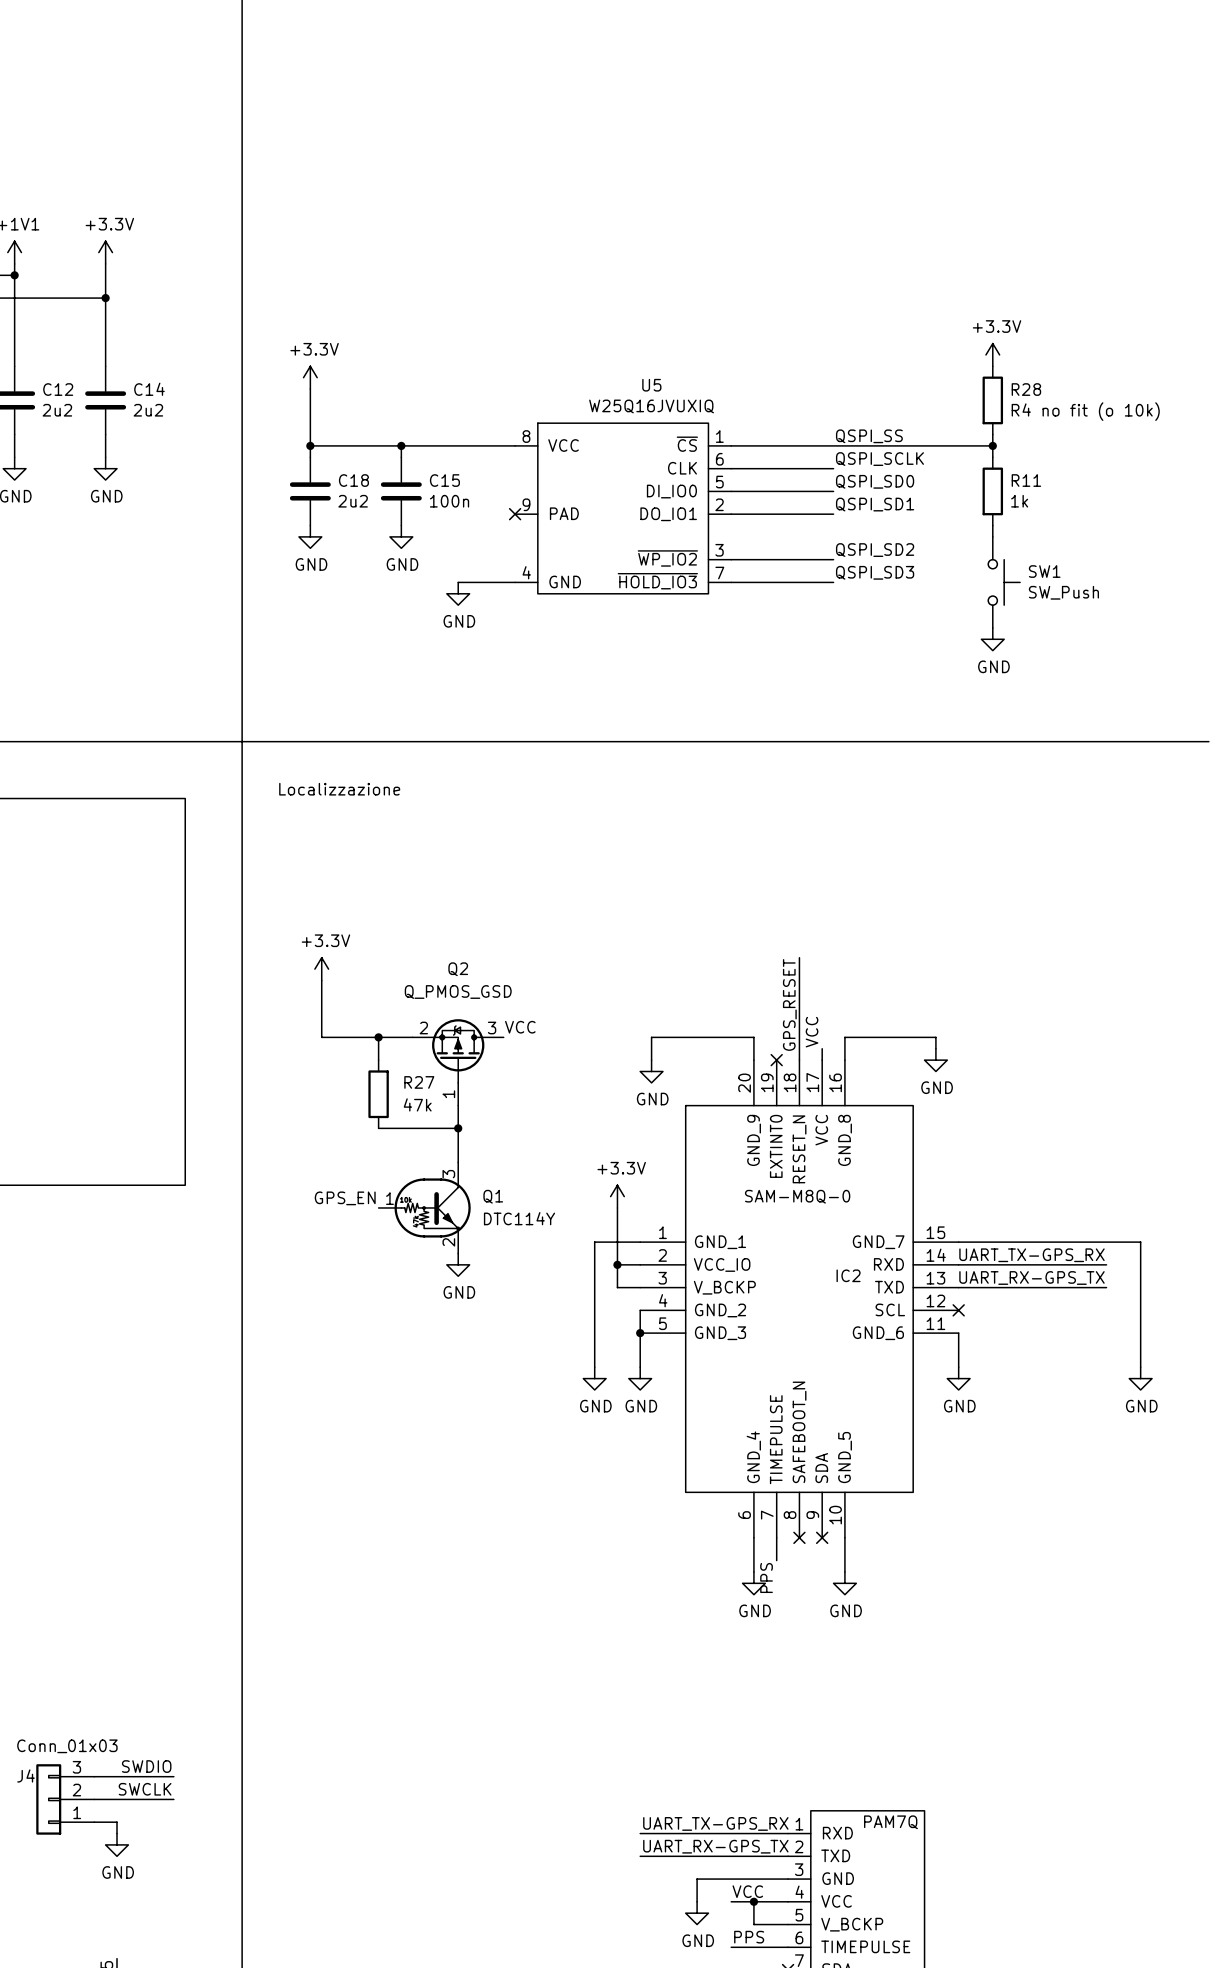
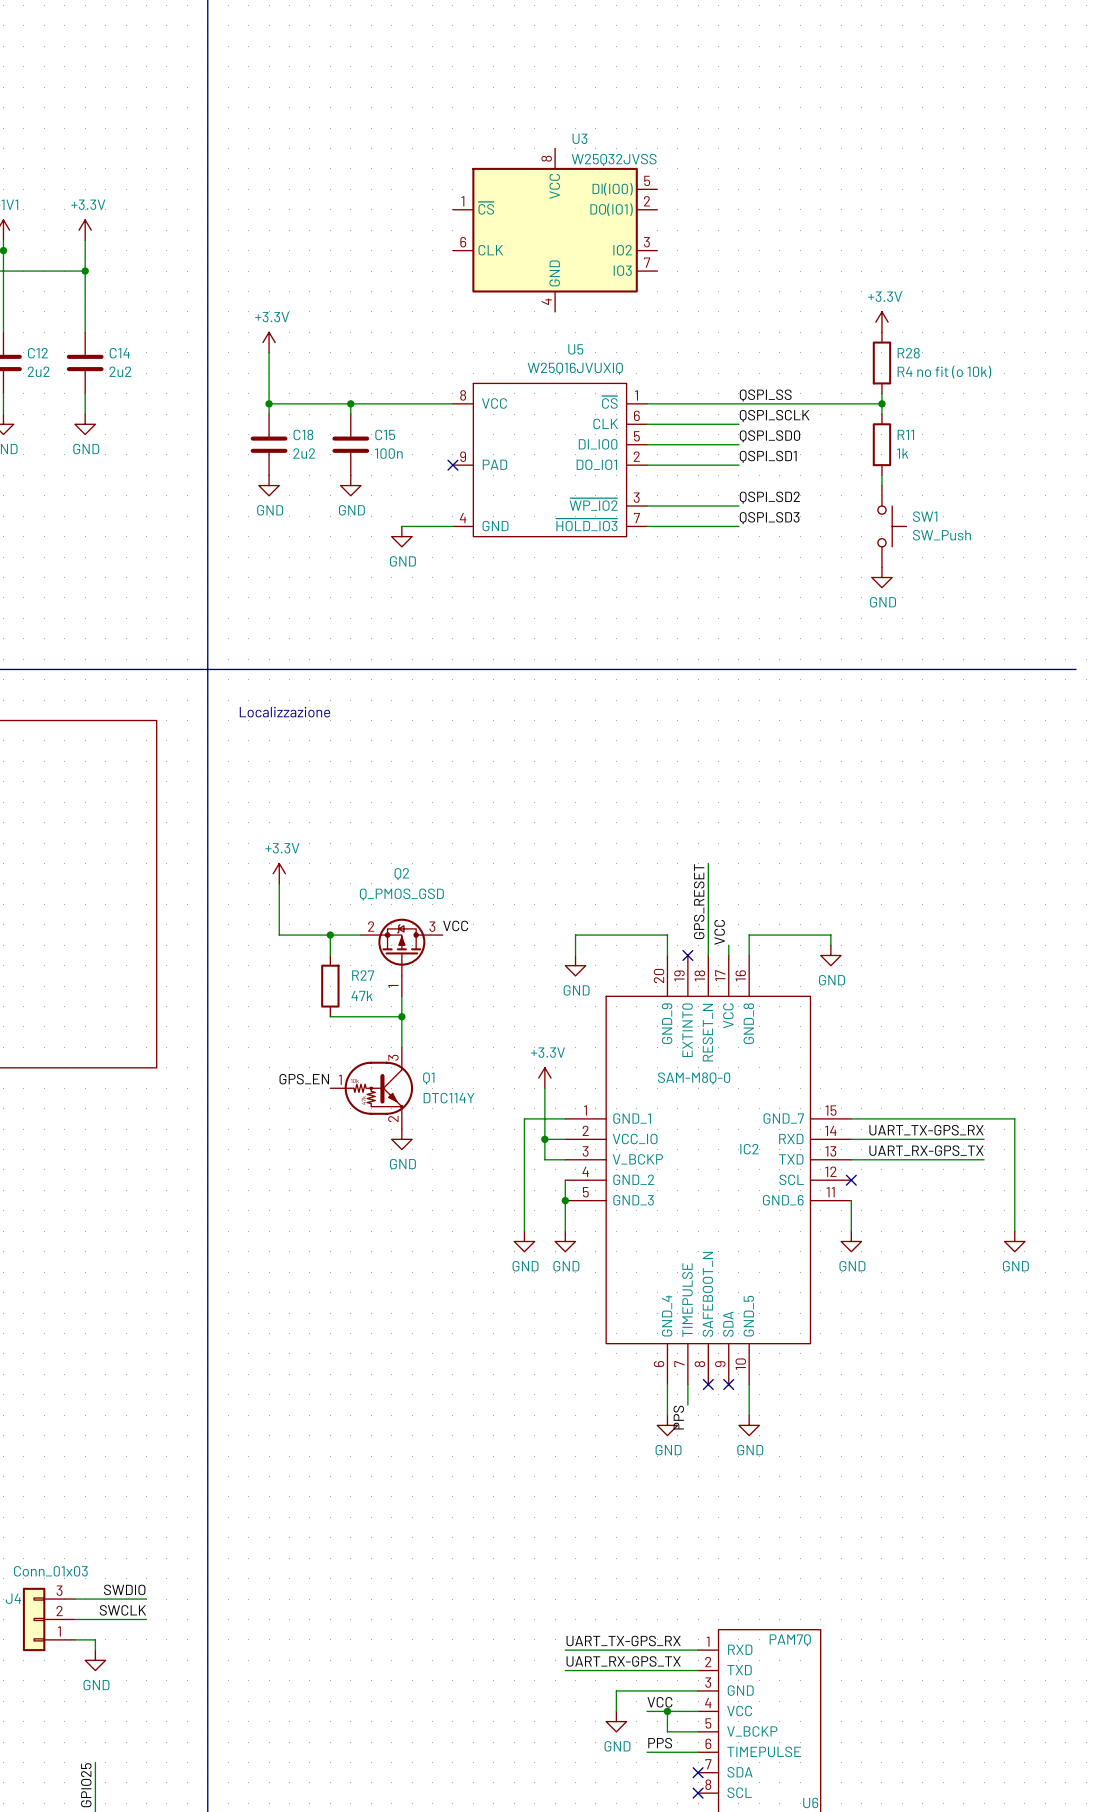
U3: none -> W25Q32JVSS (555, 230)

